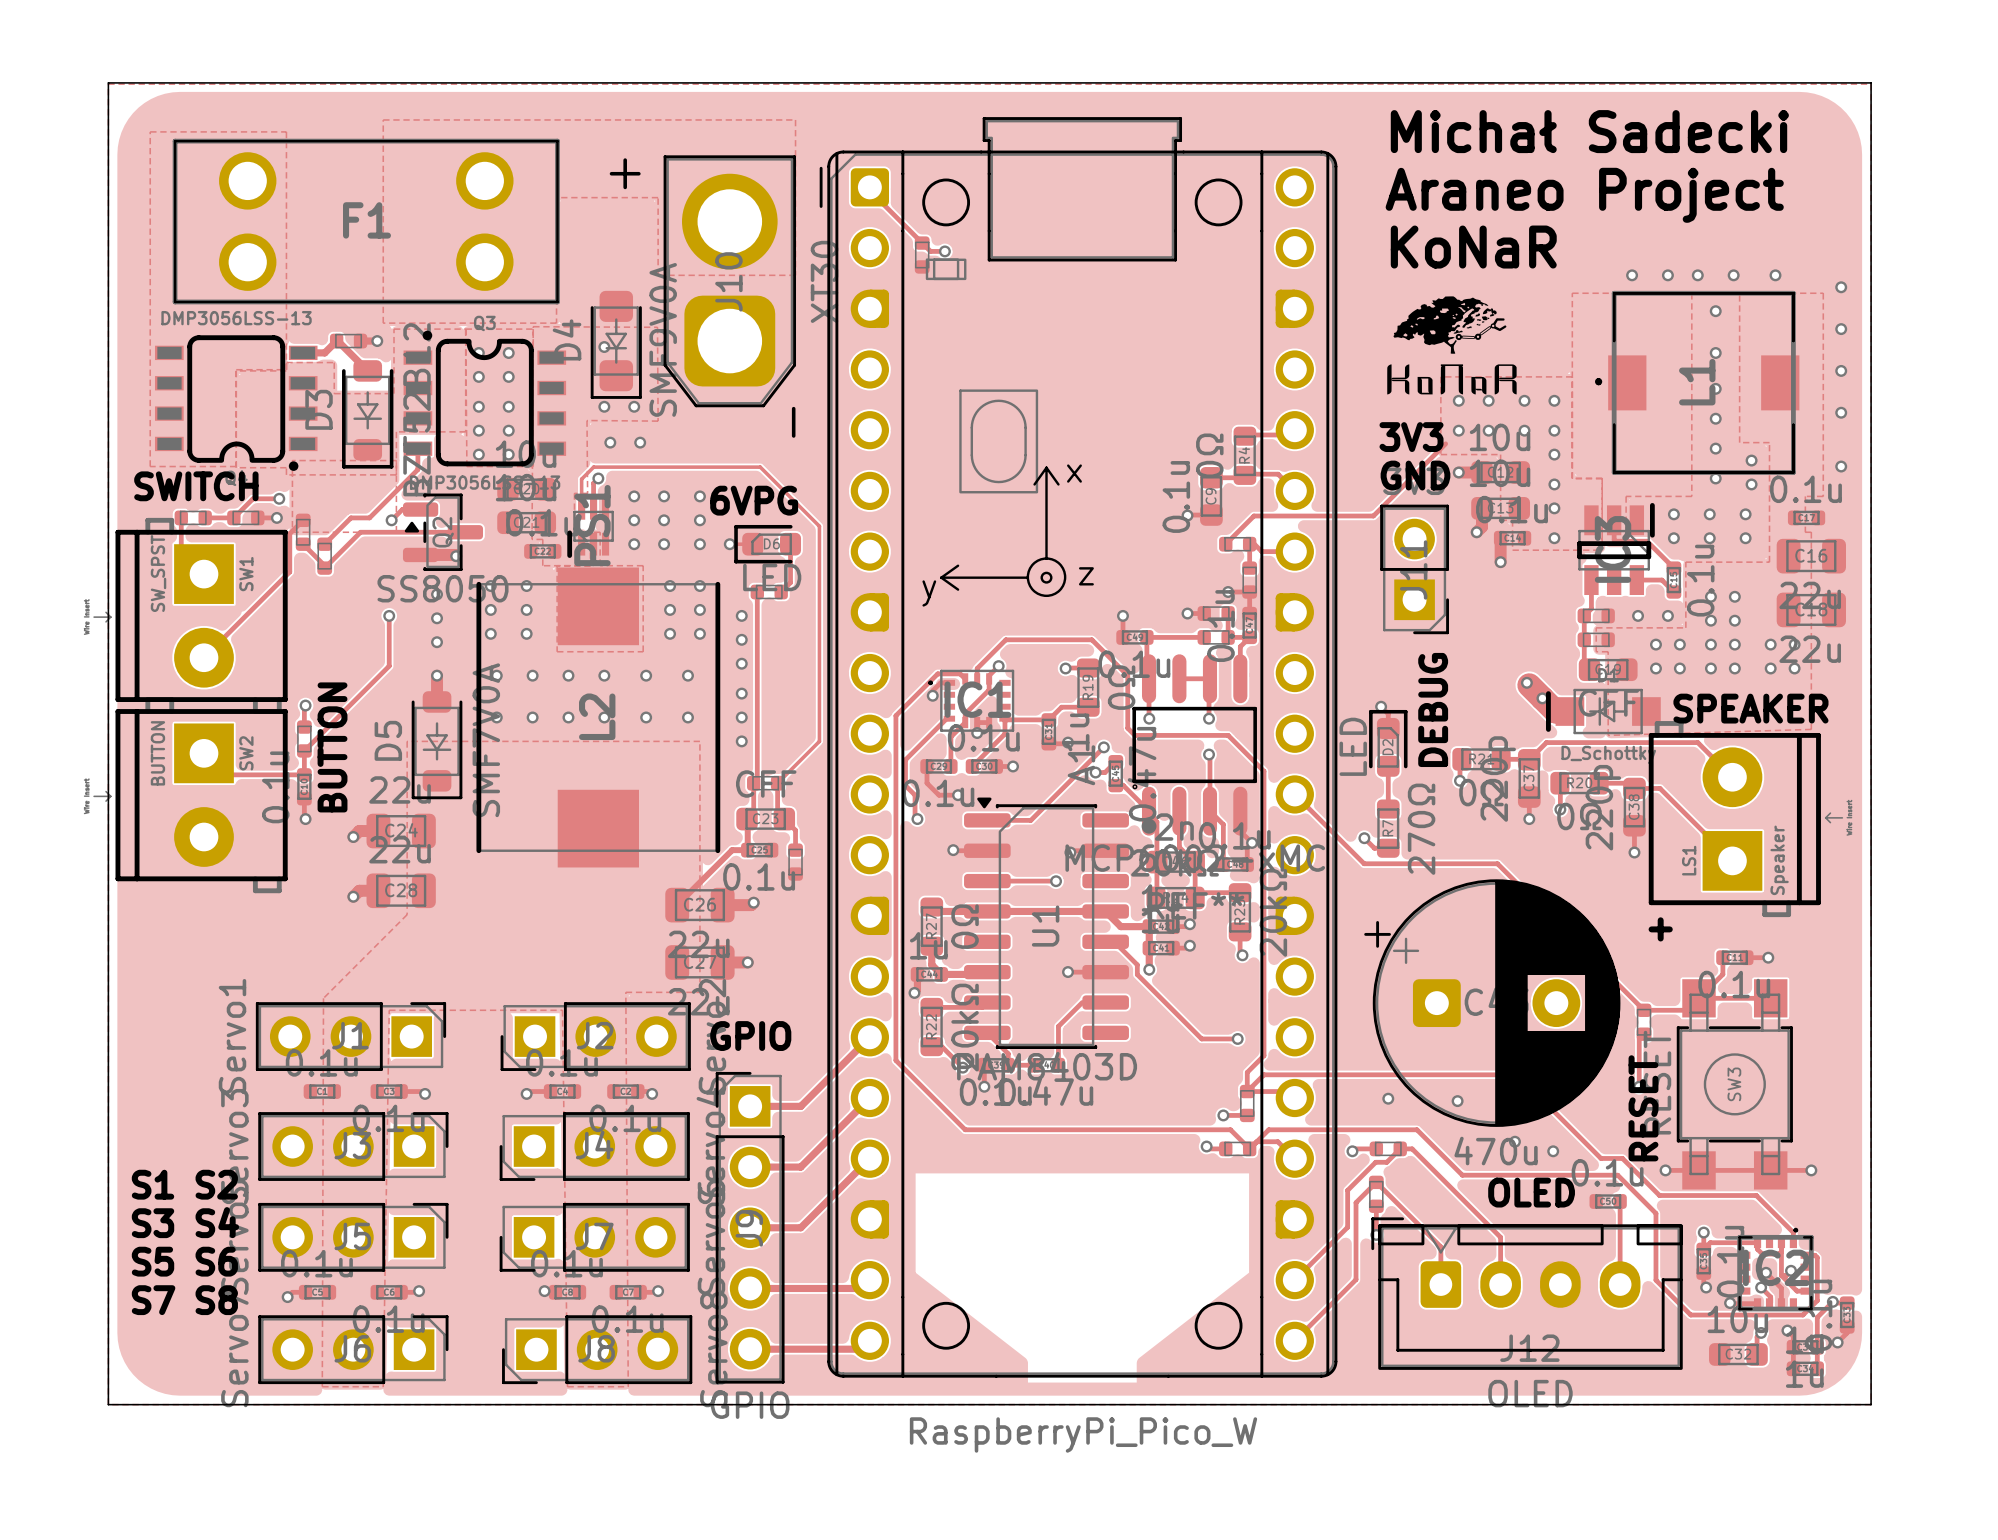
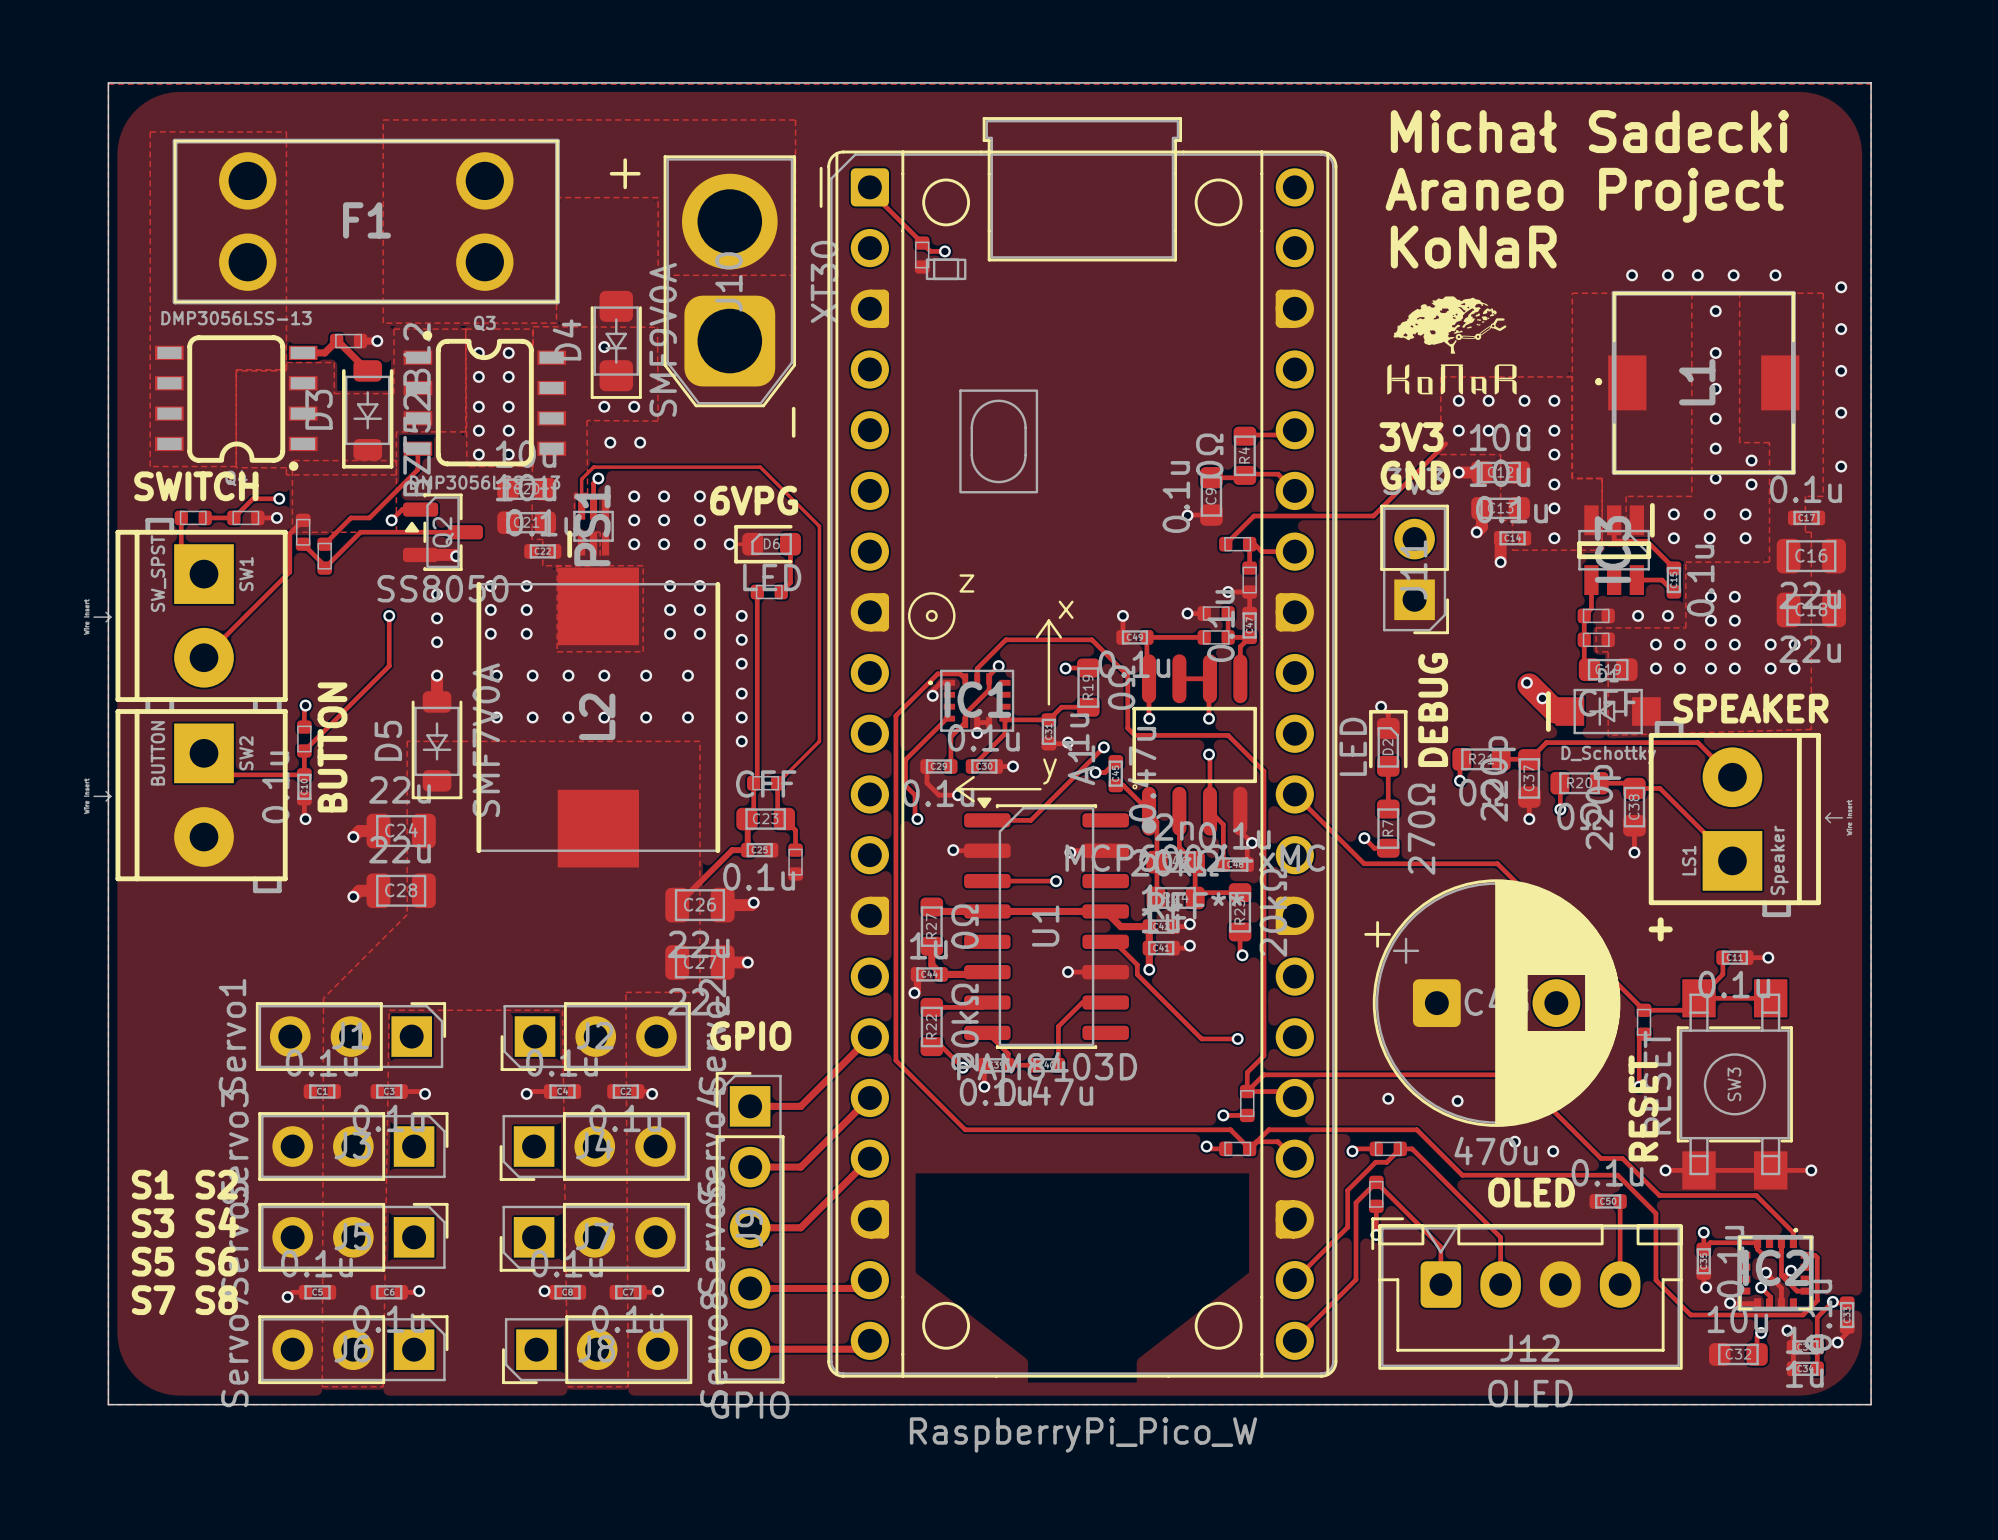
line: (1046, 467) (1034, 484) -> (1048, 620) (1036, 637)
line: (1046, 467) (1058, 484) -> (1048, 620) (1060, 637)
line: (1046, 467) (1046, 558) -> none
text position: x (1074, 473) -> x (1066, 609)
drawing: [1026, 557, 1067, 598] -> none
line: (958, 565) (941, 577) -> (973, 777) (956, 789)
text position: z (1086, 576) -> z (966, 583)
line: (941, 577) (958, 589) -> (956, 789) (973, 801)
line: (941, 577) (1027, 577) -> none
drawing position: (1046, 577) -> (931, 615)
drawing: none -> [908, 592, 956, 640]
text position: y (929, 593) -> y (1050, 771)
line: none -> (1048, 620) (1048, 704)
line: none -> (956, 789) (1040, 789)

